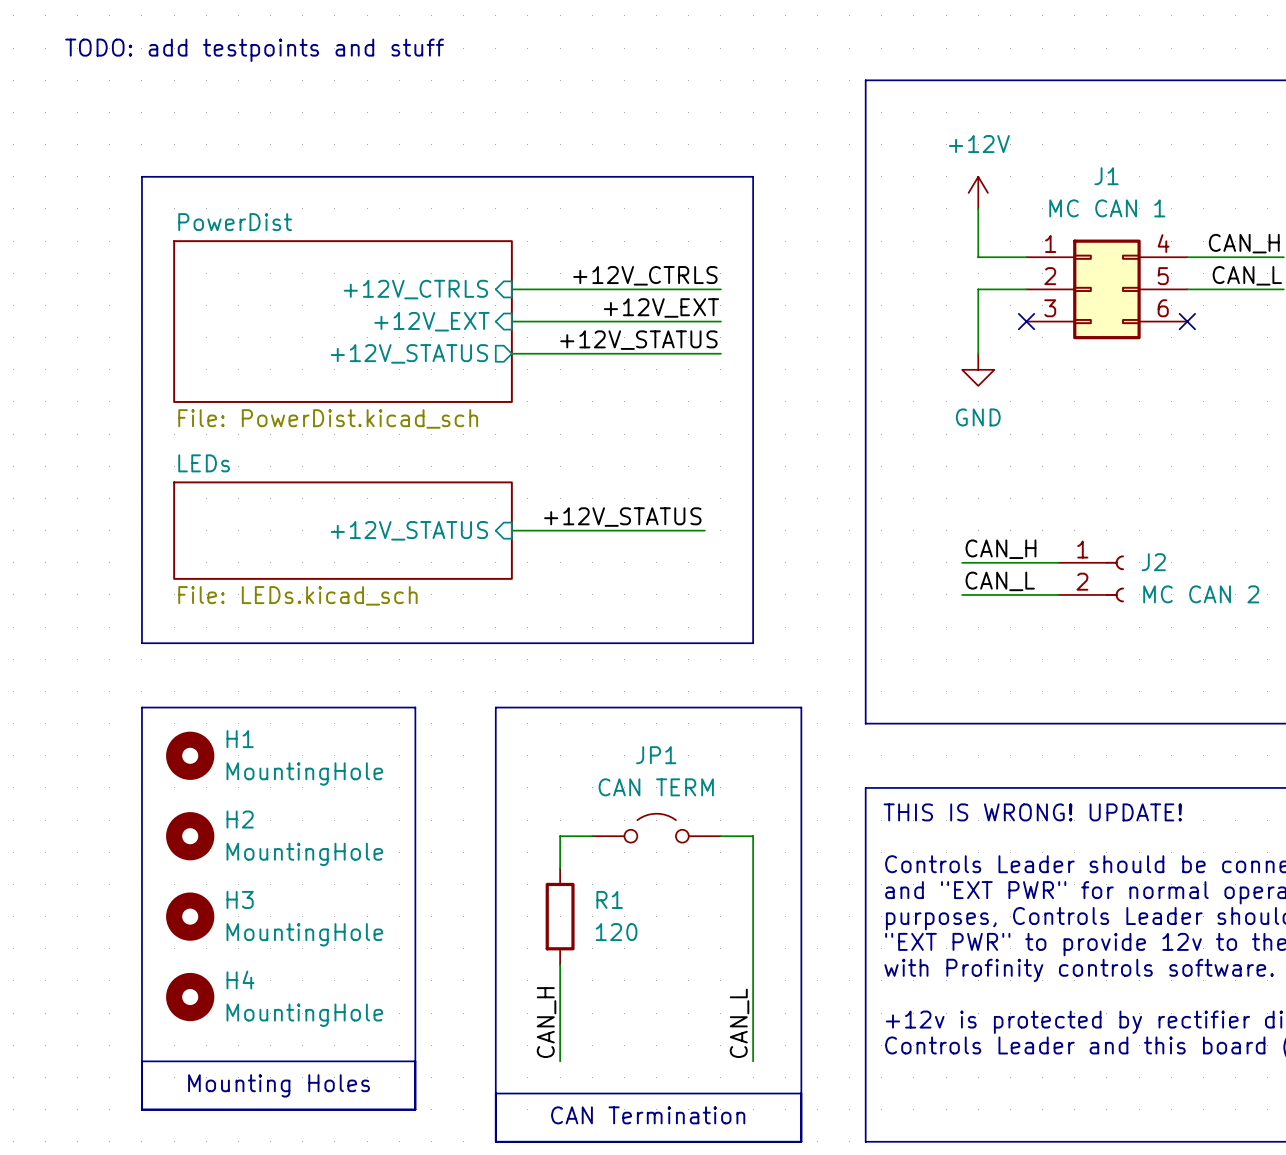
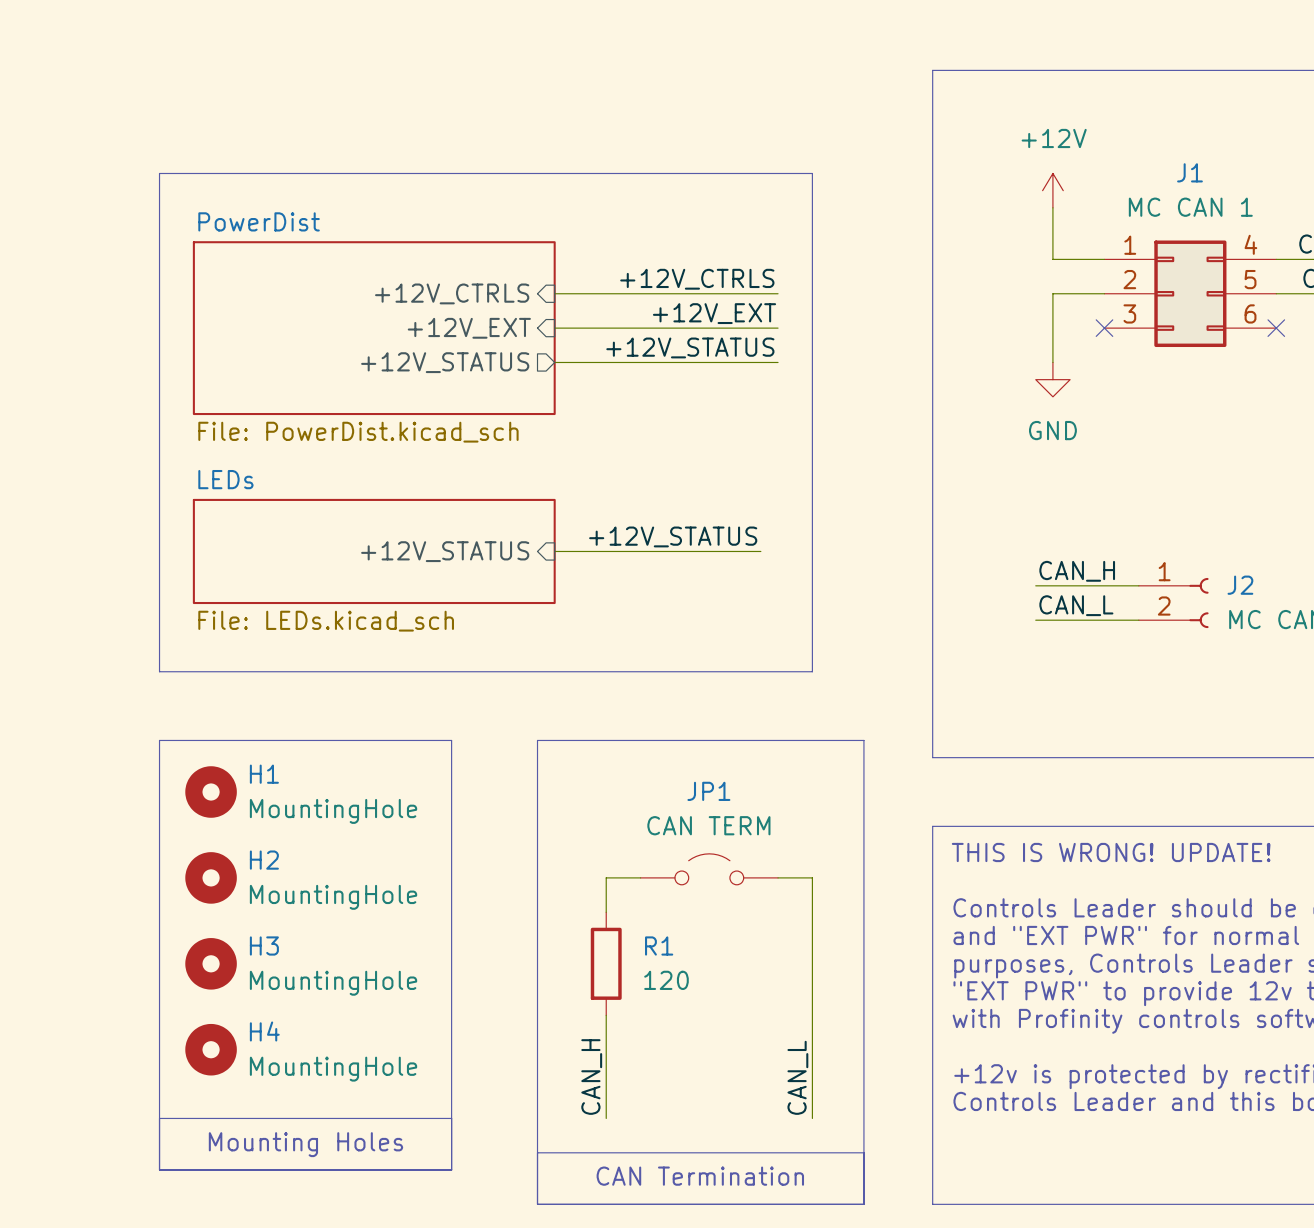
text: TODO: add testpoints and stuff (254, 50) -> none

